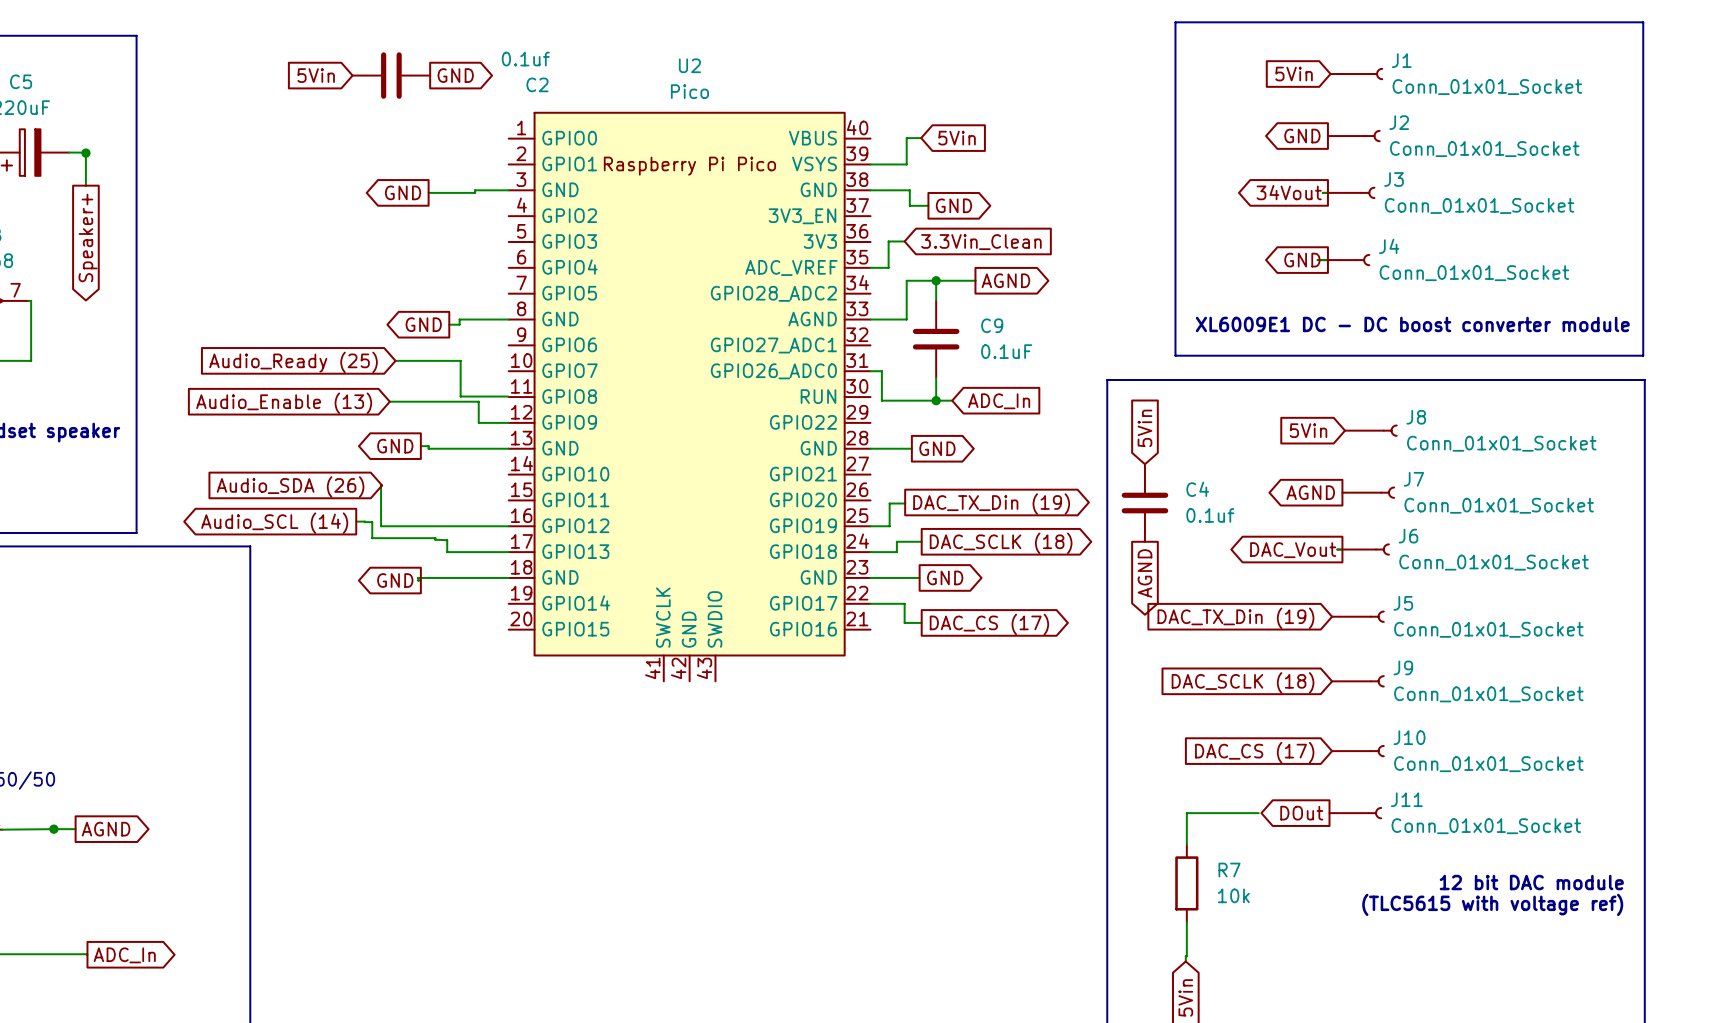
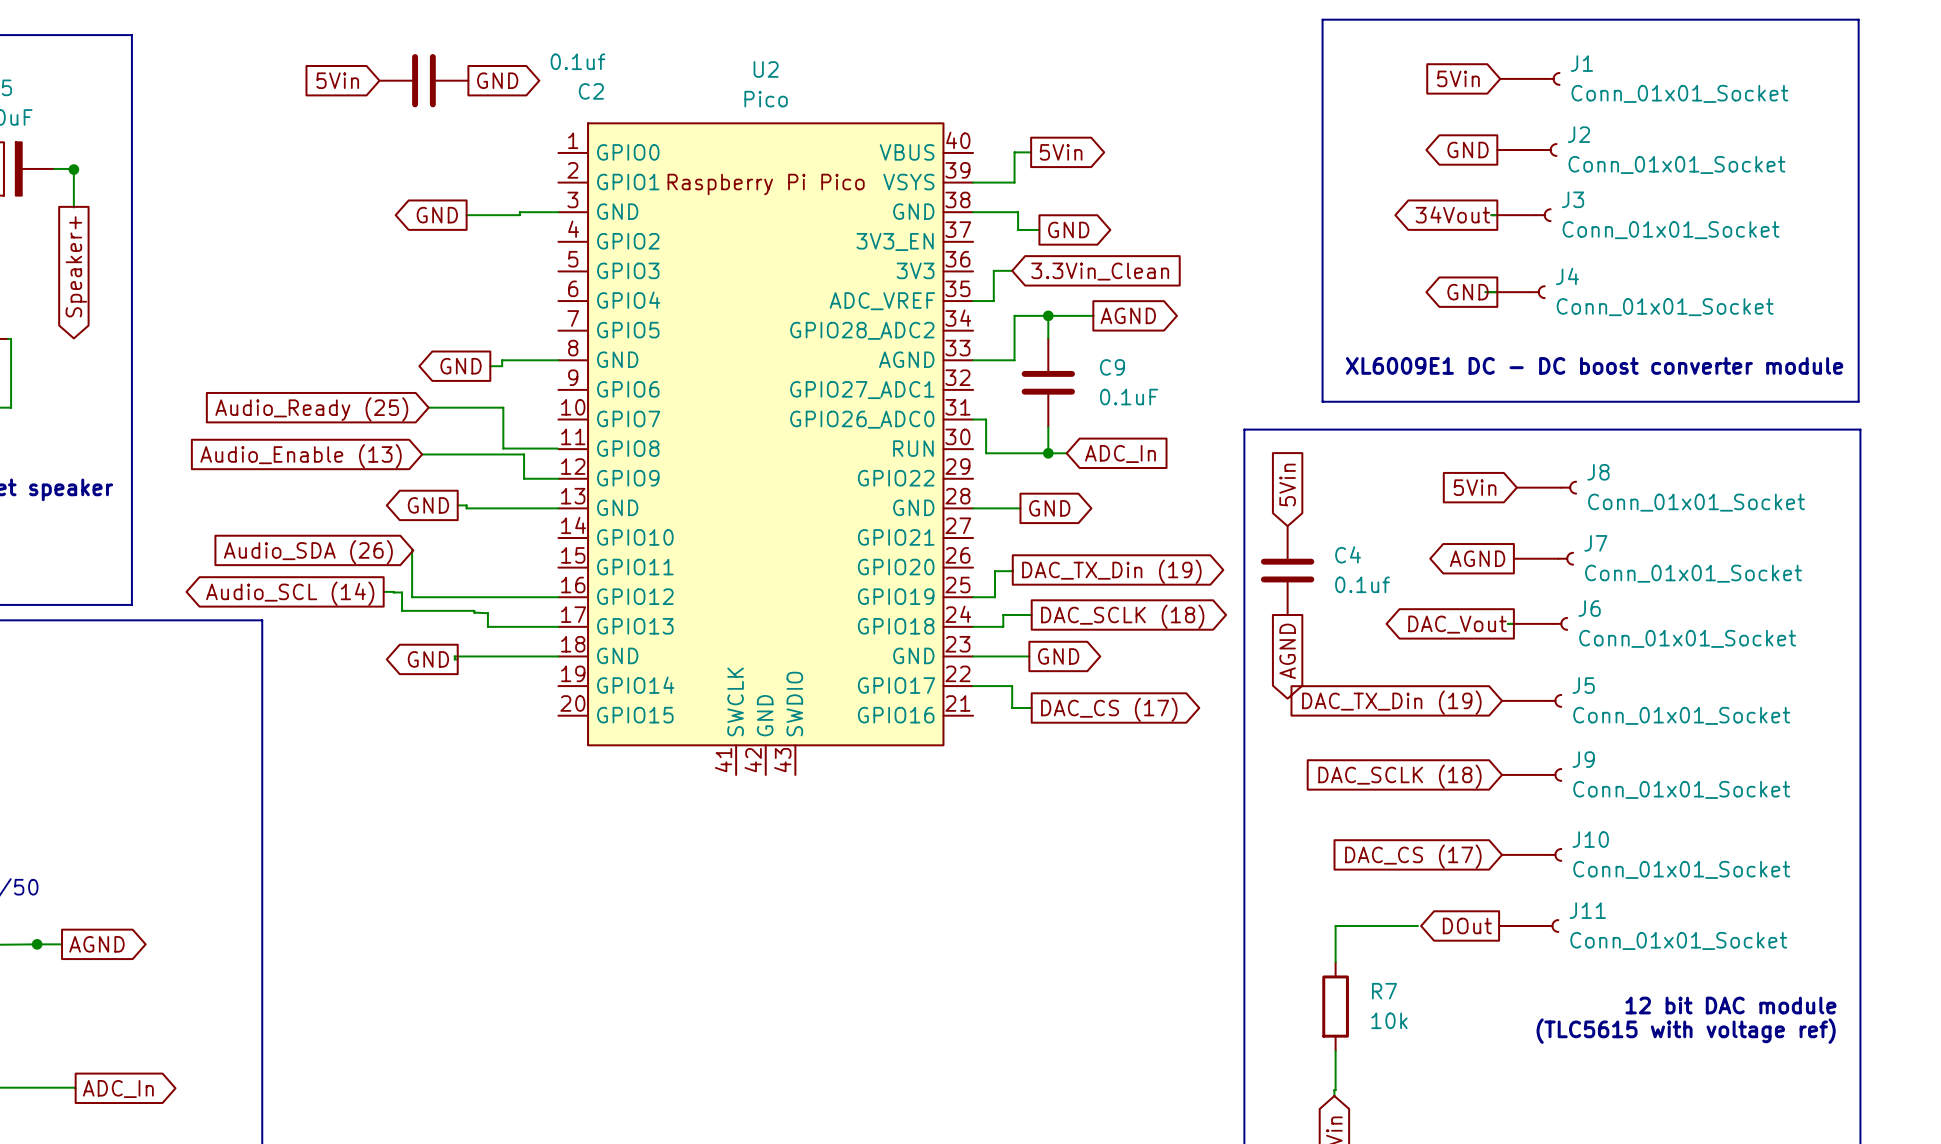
global label shape: input (957, 138) -> output (1061, 152)

